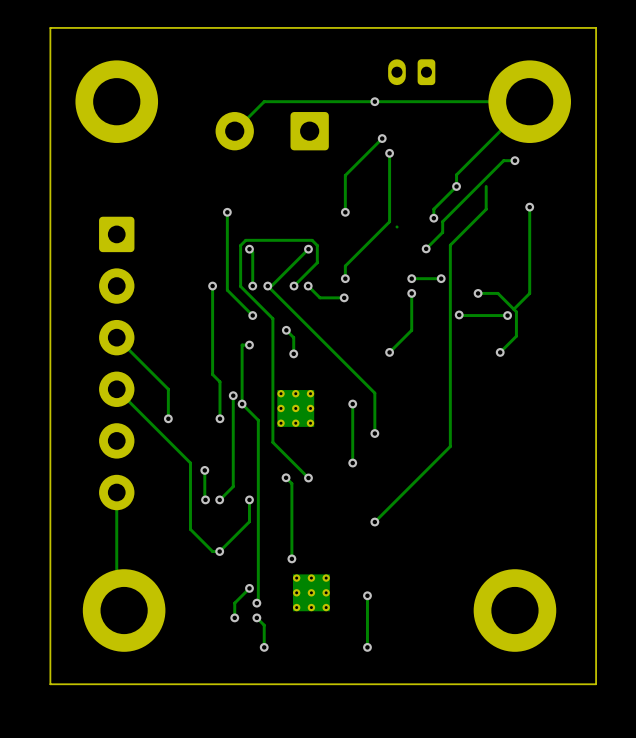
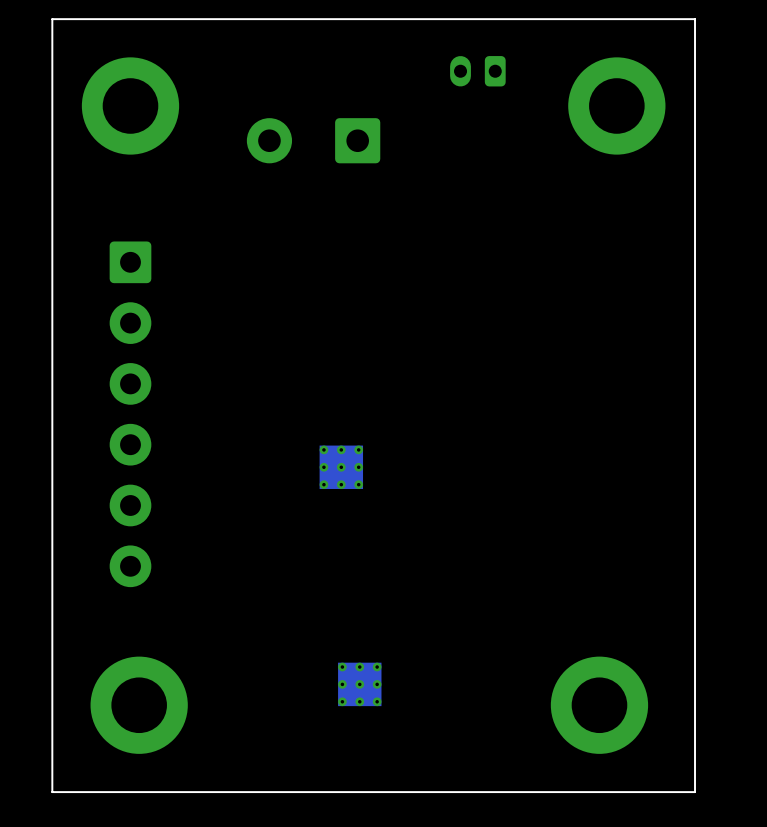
via: (374, 101) -> none
track: (234, 131) (264, 101) (529, 101) (456, 174) (456, 186) (433, 209) (433, 218) -> none
track: (382, 138) (345, 175) (345, 212) -> none
via: (382, 138) -> none
track: (389, 153) (389, 221) (345, 266) (345, 278) -> none
via: (389, 153) -> none
track: (514, 160) (503, 160) (442, 221) (442, 232) (426, 248) -> none
via: (514, 160) -> none
via: (456, 186) -> none
track: (486, 186) (486, 209) (450, 245) (450, 446) (374, 522) -> none
track: (529, 207) (529, 293) (513, 309) -> none
via: (529, 207) -> none
track: (227, 212) (227, 290) (252, 315) -> none
via: (227, 212) -> none
via: (345, 212) -> none
via: (433, 218) -> none
via: (426, 248) -> none
track: (249, 249) (252, 252) (252, 286) -> none
via: (249, 249) -> none
track: (308, 249) (271, 286) (267, 286) (374, 393) (374, 433) -> none
via: (308, 249) -> none
via: (345, 278) -> none
via: (411, 278) -> none
track: (441, 278) (411, 278) -> none
via: (441, 278) -> none
track: (212, 286) (212, 374) (219, 381) (219, 418) -> none
via: (212, 286) -> none
via: (252, 286) -> none
via: (267, 286) -> none
track: (294, 286) (317, 262) (317, 245) (312, 240) (245, 240) (240, 245) (240, 286) (272, 318) (272, 442) (308, 478) -> none
via: (294, 286) -> none
track: (308, 286) (319, 297) (344, 297) -> none
via: (308, 286) -> none
track: (411, 293) (411, 330) (389, 352) -> none
via: (411, 293) -> none
track: (478, 293) (497, 293) (516, 311) (516, 336) (500, 352) -> none
via: (478, 293) -> none
via: (344, 297) -> none
track: (459, 314) (507, 315) -> none
via: (459, 314) -> none
via: (252, 315) -> none
via: (507, 315) -> none
track: (286, 330) (293, 337) (293, 353) -> none
via: (286, 330) -> none
track: (116, 337) (168, 389) (168, 418) -> none
track: (249, 345) (242, 345) (242, 404) (258, 420) (256, 603) -> none
via: (249, 345) -> none
via: (389, 352) -> none
via: (500, 352) -> none
via: (293, 353) -> none
track: (116, 389) (190, 463) (190, 529) (212, 551) (219, 551) (249, 521) (249, 499) -> none
track: (233, 395) (233, 486) (219, 499) -> none
via: (233, 395) -> none
via: (242, 404) -> none
track: (352, 404) (352, 463) -> none
via: (352, 404) -> none
via: (168, 418) -> none
via: (219, 418) -> none
via: (374, 433) -> none
via: (352, 463) -> none
track: (204, 470) (205, 499) -> none
via: (204, 470) -> none
track: (286, 477) (291, 483) (291, 558) -> none
via: (286, 477) -> none
via: (308, 478) -> none
track: (116, 492) (116, 603) (124, 610) -> none
via: (205, 499) -> none
via: (219, 499) -> none
via: (249, 499) -> none
via: (374, 522) -> none
via: (219, 551) -> none
via: (291, 558) -> none
track: (249, 588) (234, 603) (234, 617) -> none
via: (249, 588) -> none
track: (367, 595) (367, 647) -> none
via: (367, 595) -> none
via: (256, 603) -> none
via: (234, 617) -> none
track: (256, 617) (264, 625) (264, 647) -> none
via: (256, 617) -> none
via: (264, 647) -> none
via: (367, 647) -> none

